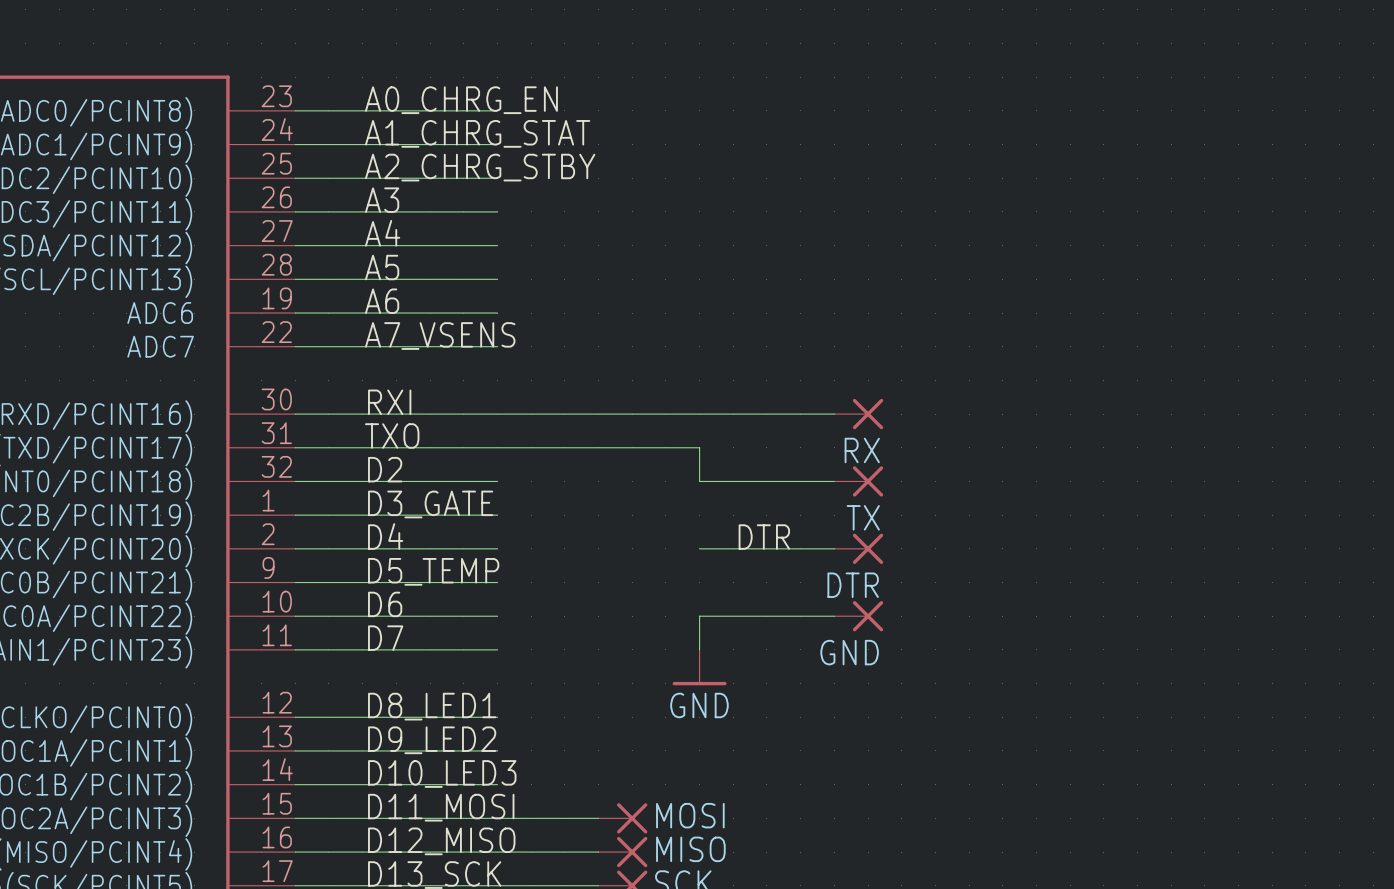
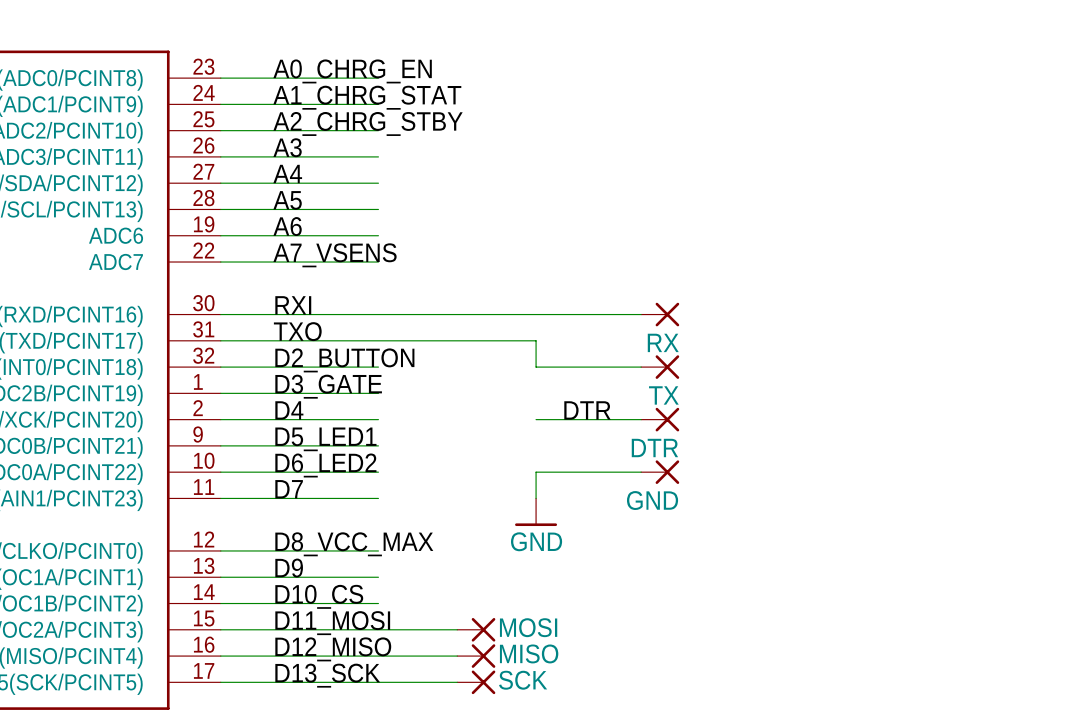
label: D2 (385, 469) -> D2_BUTTON (344, 360)
label: D5_TEMP (433, 571) -> D5_LED1 (325, 439)
label: D6 (385, 604) -> D6_LED2 (325, 465)
label: D8_LED1 (432, 706) -> D8_VCC_MAX (354, 544)
label: D9_LED2 (432, 740) -> D9 (289, 568)
label: D10_LED3 (442, 773) -> D10_CS (319, 596)

